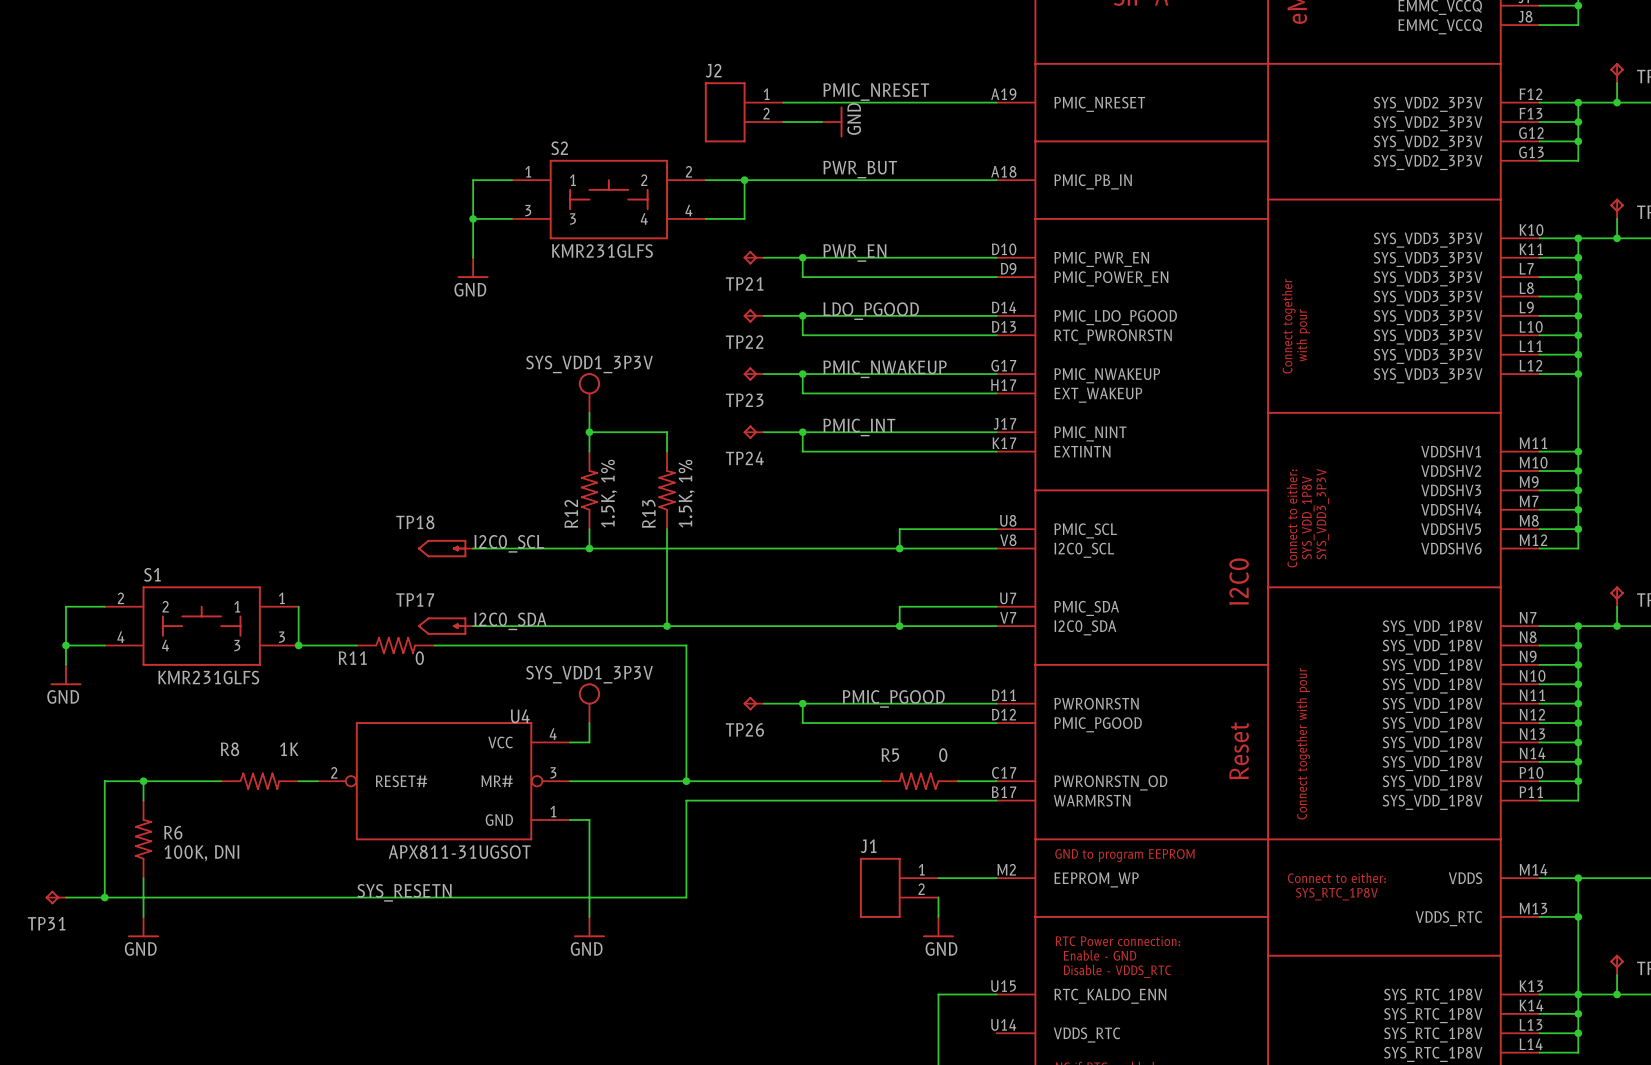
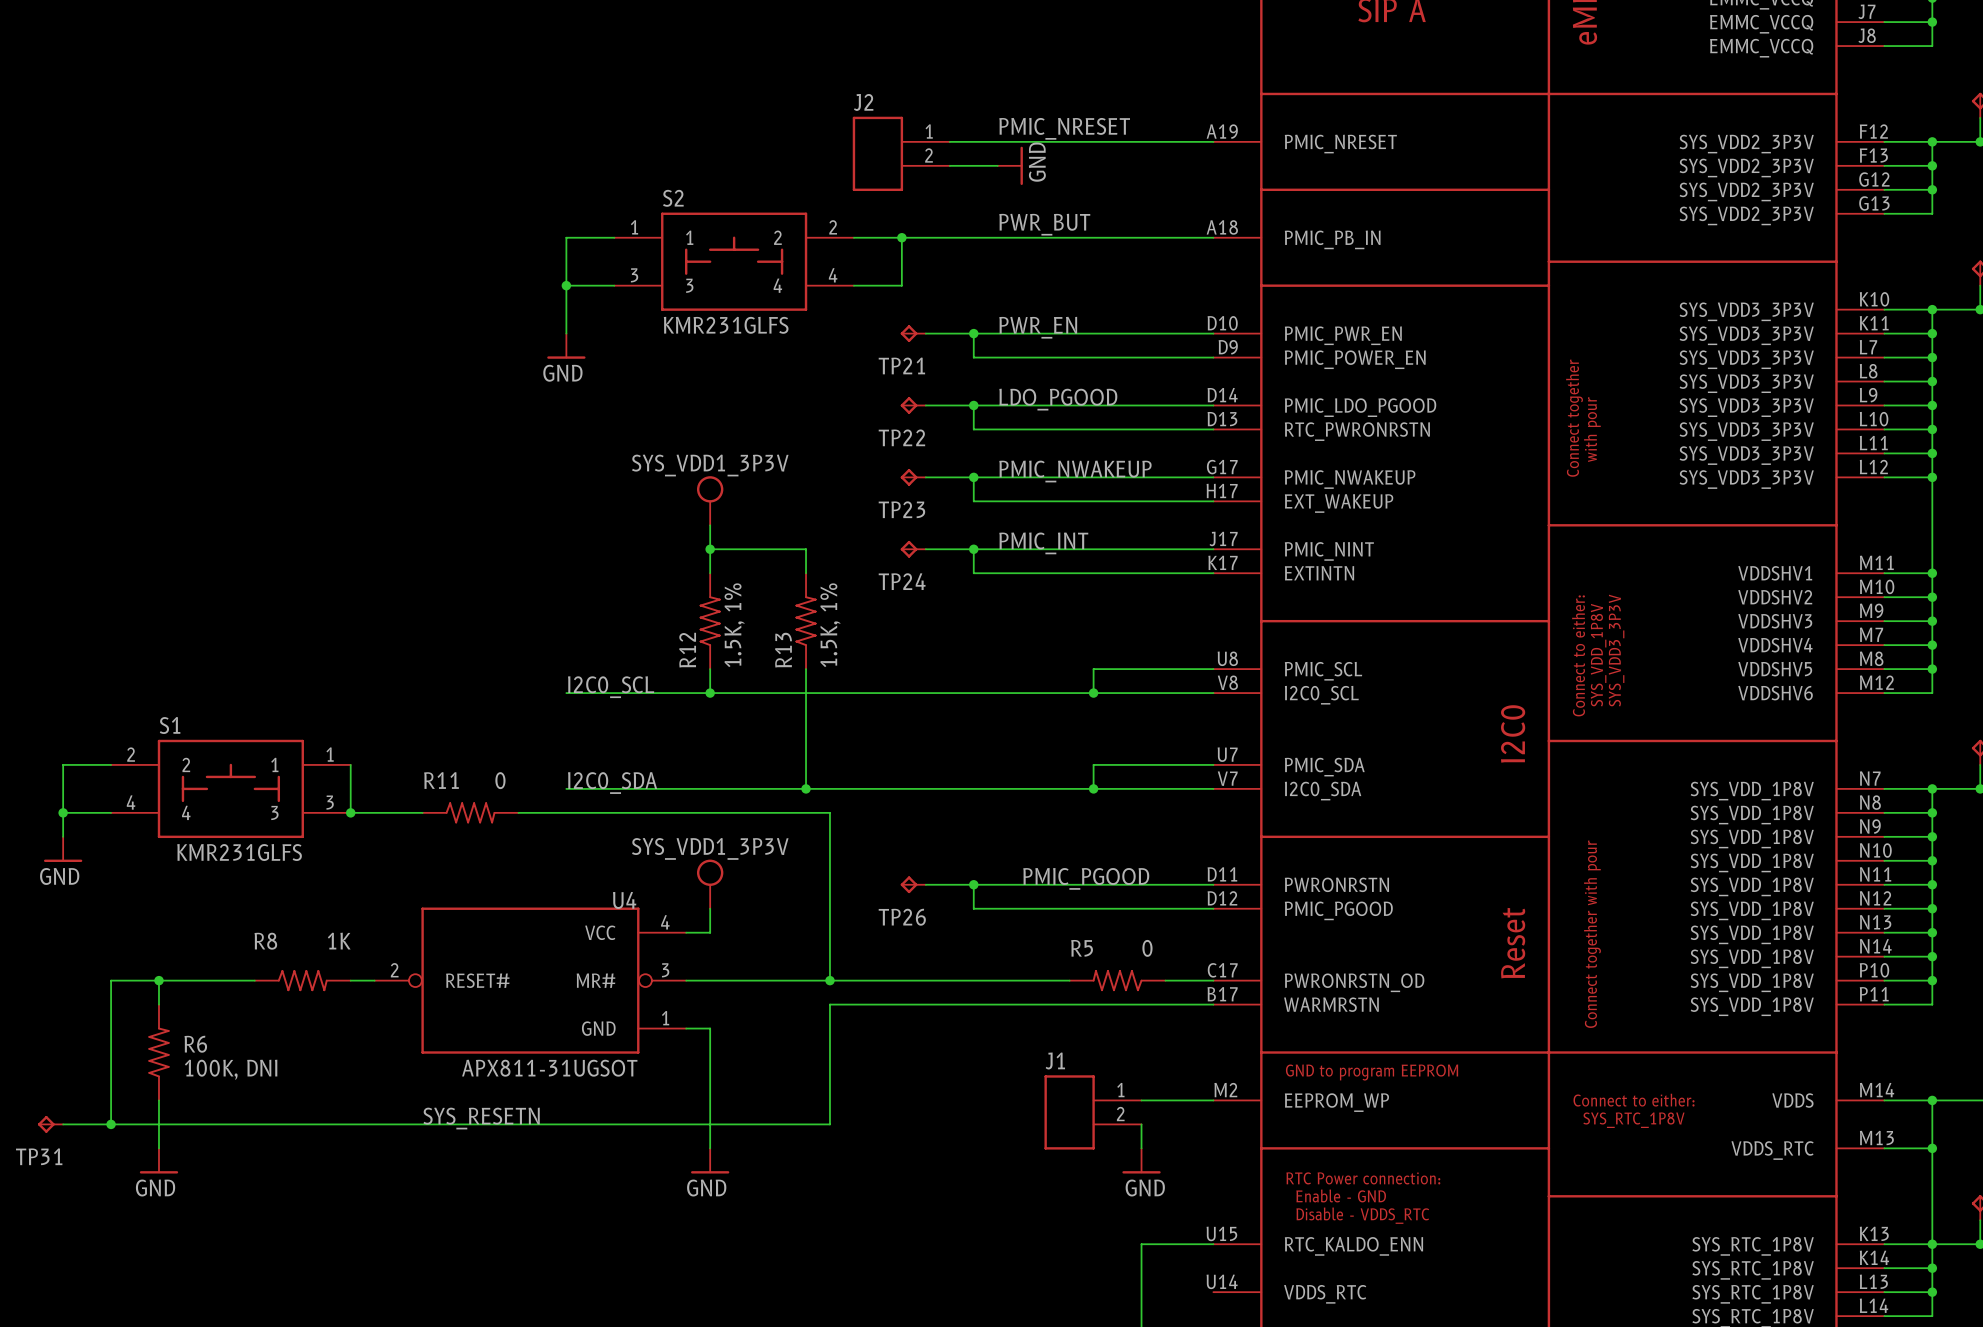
TP18: (445, 548) -> none
TP17: (445, 626) -> none
R11 name position: R11 (352, 658) -> R11 (441, 780)
R11 value position: 0 (419, 658) -> 0 (500, 780)

